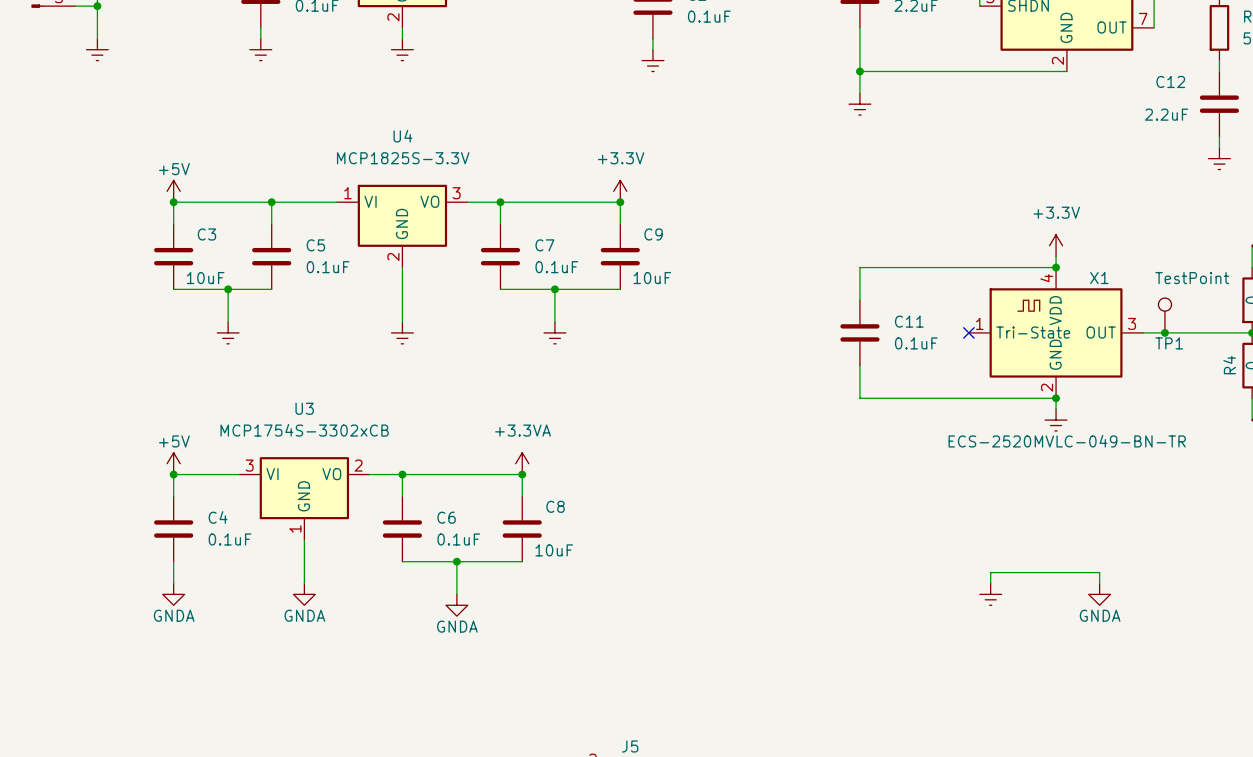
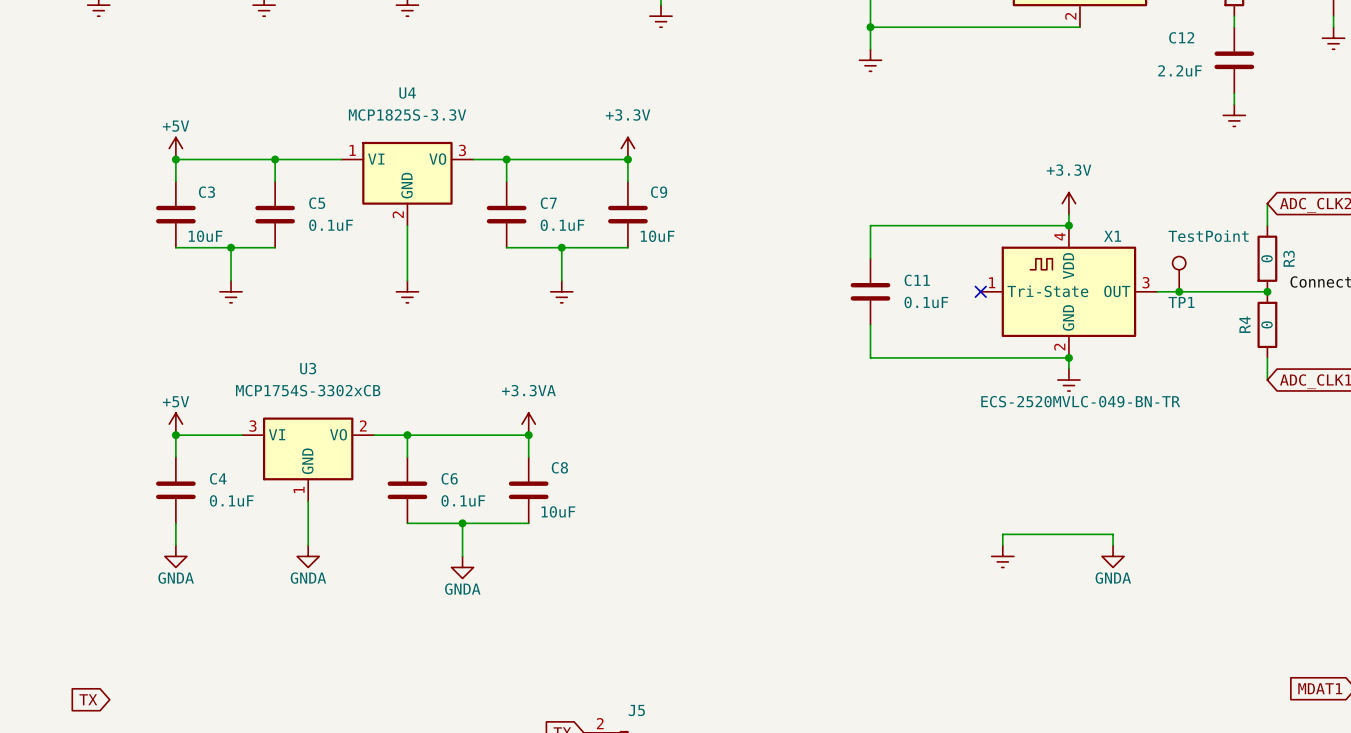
global label: none -> TX (88, 699)

